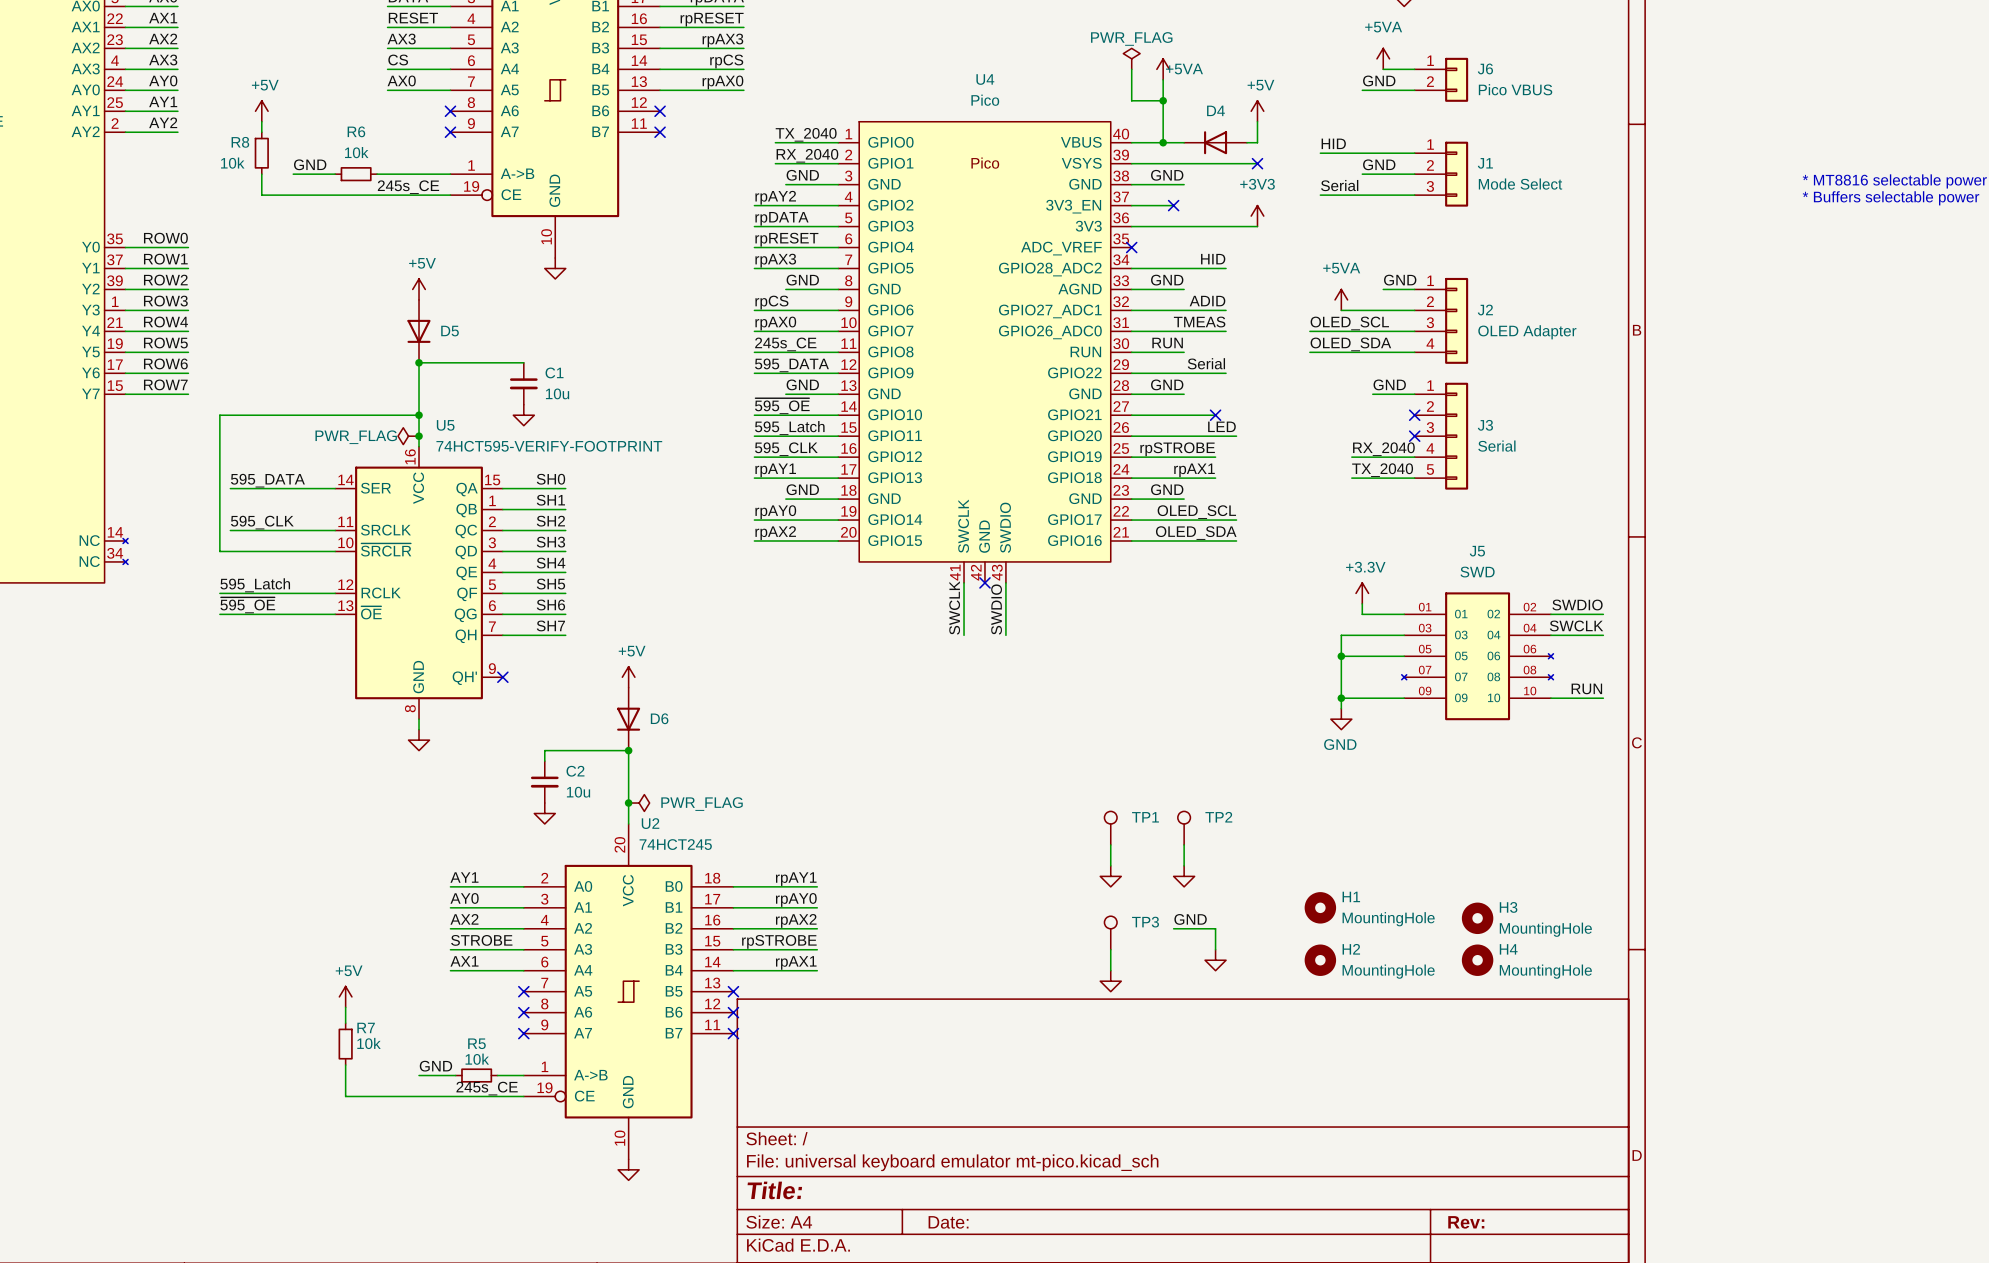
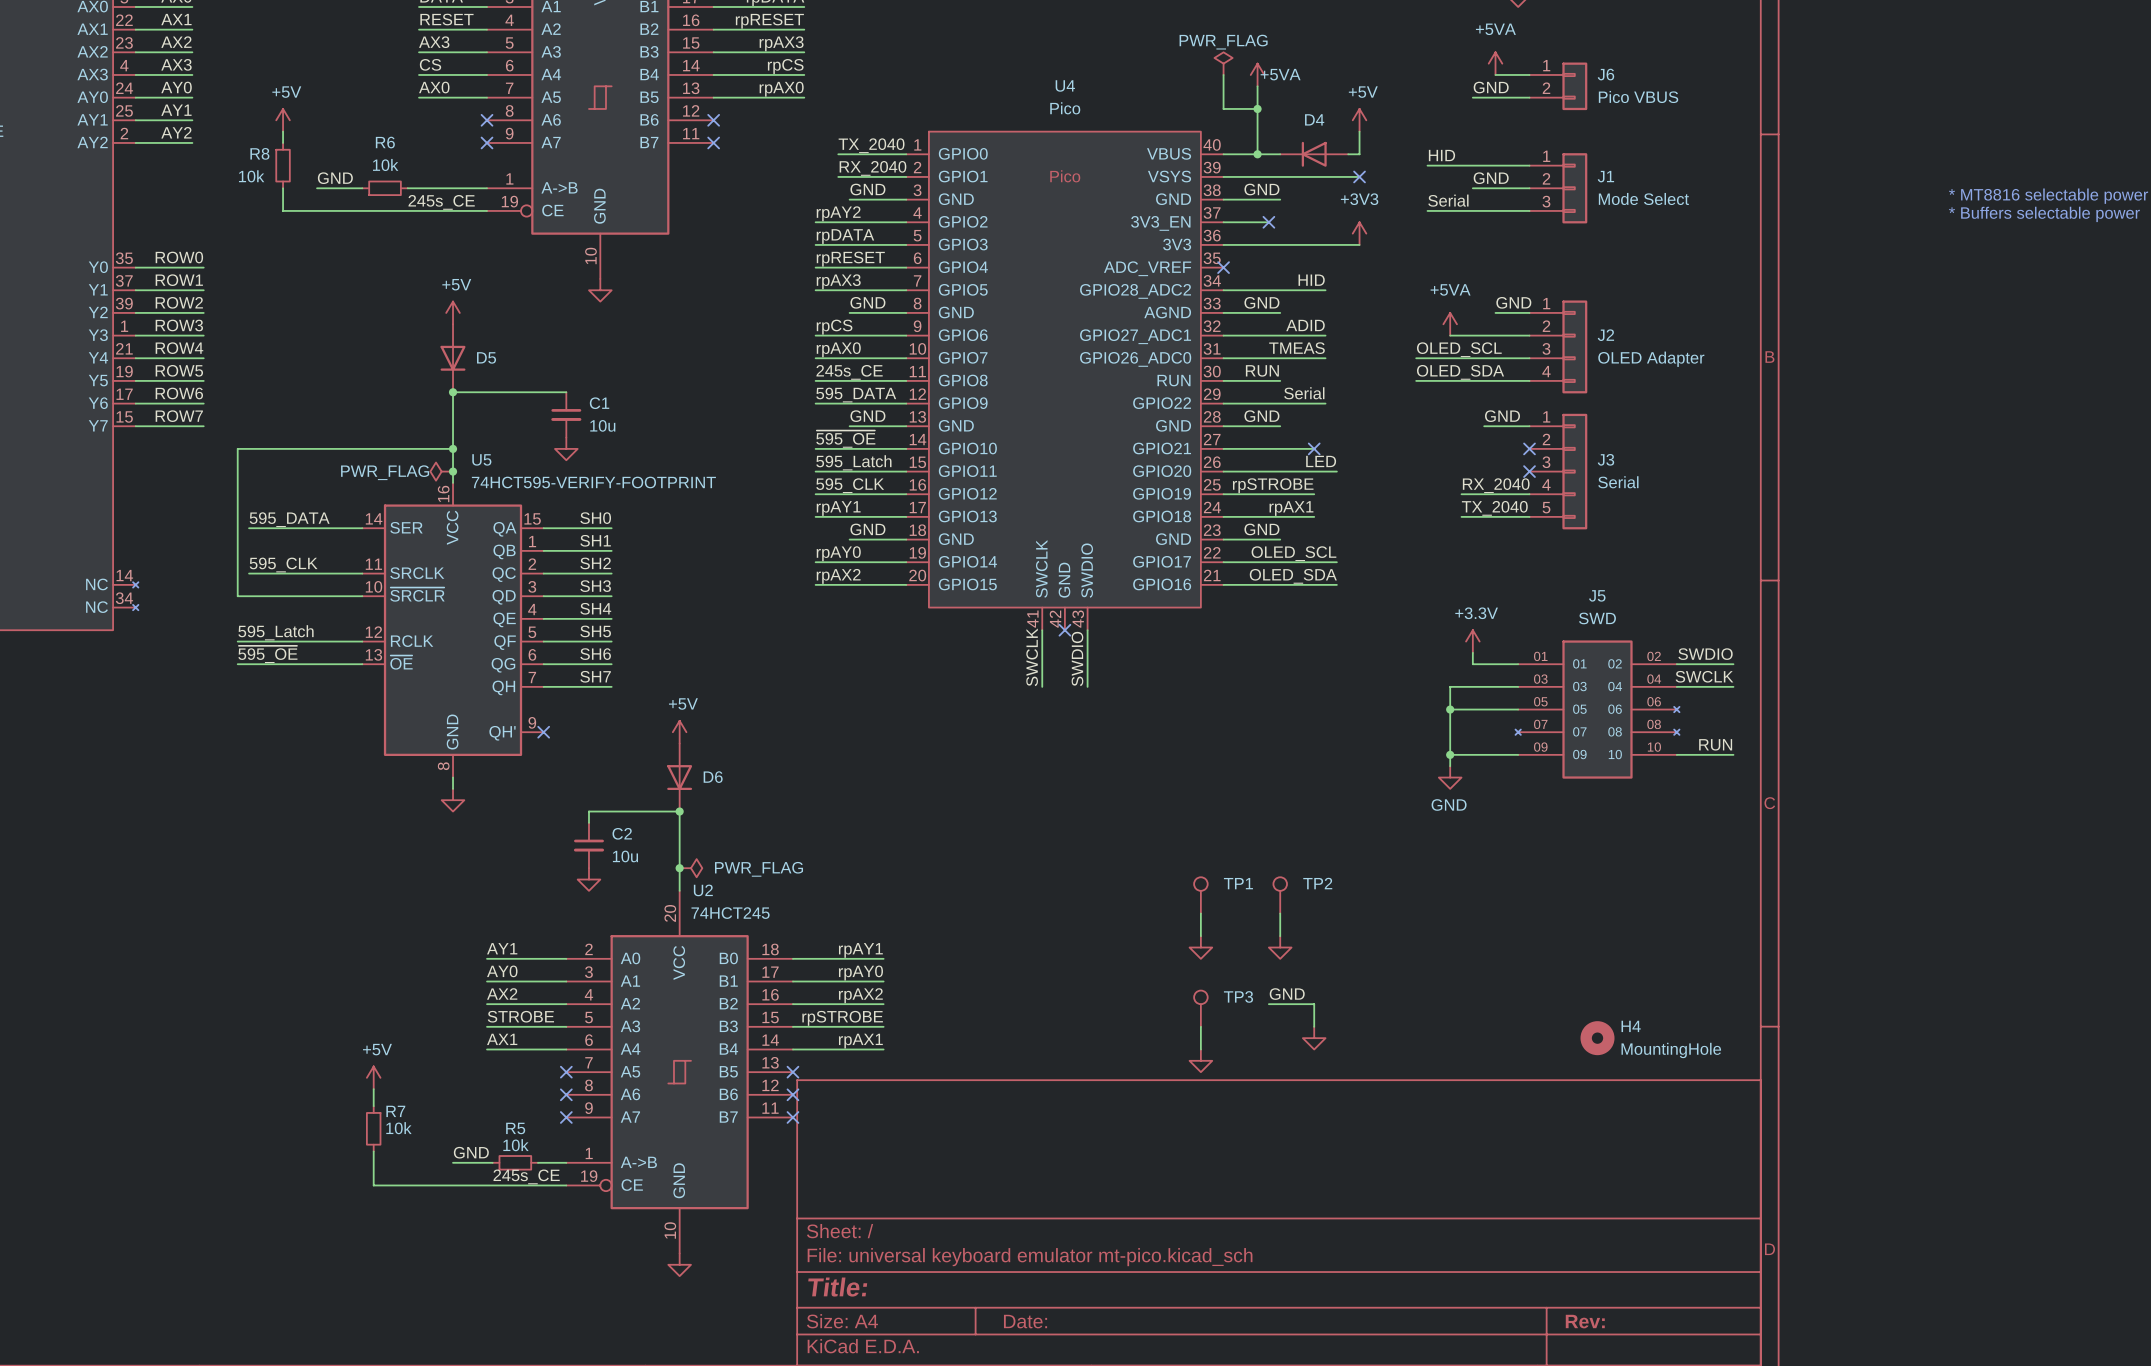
H1: MountingHole (1320, 907) -> none
H3: MountingHole (1477, 918) -> none
H2: MountingHole (1320, 960) -> none

